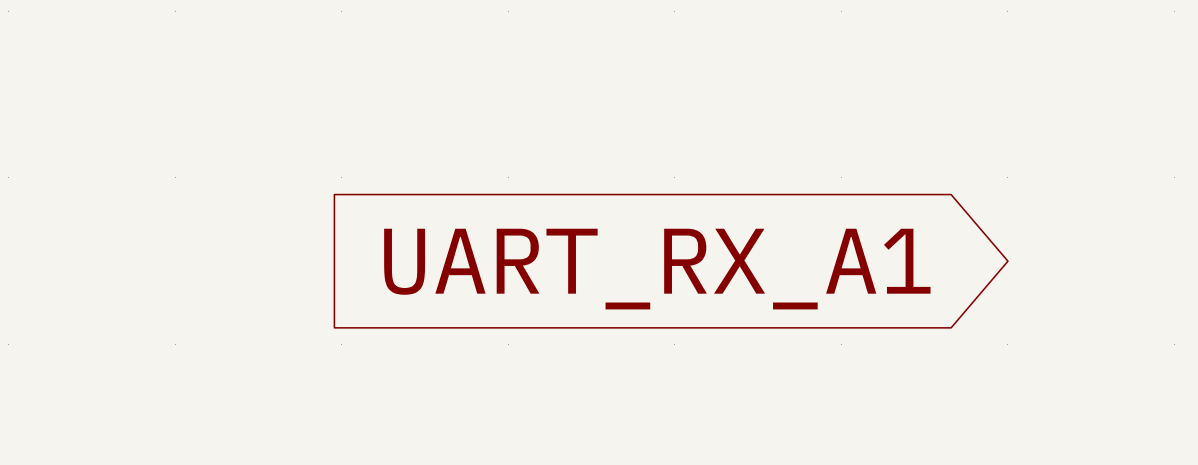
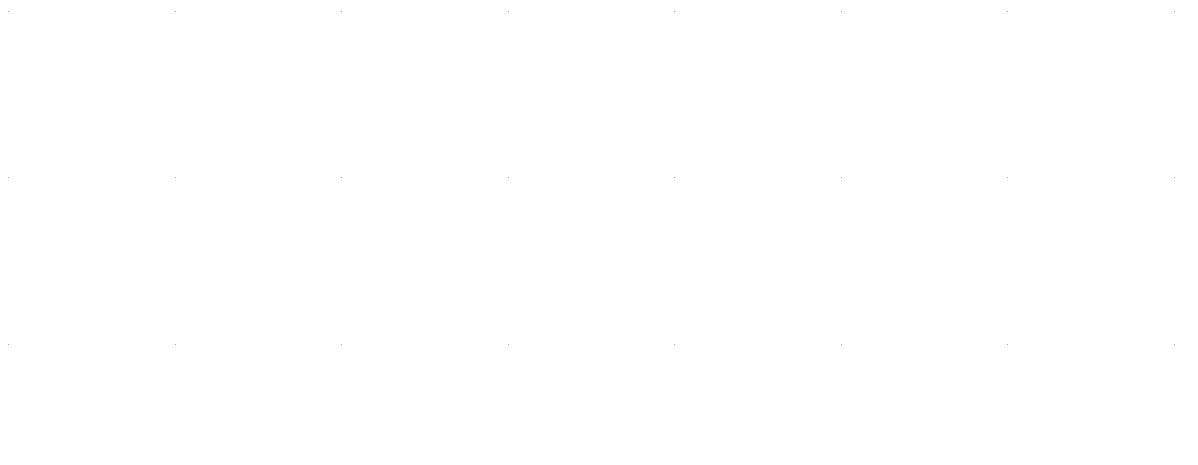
global label: UART_RX_A1 (657, 269) -> none

